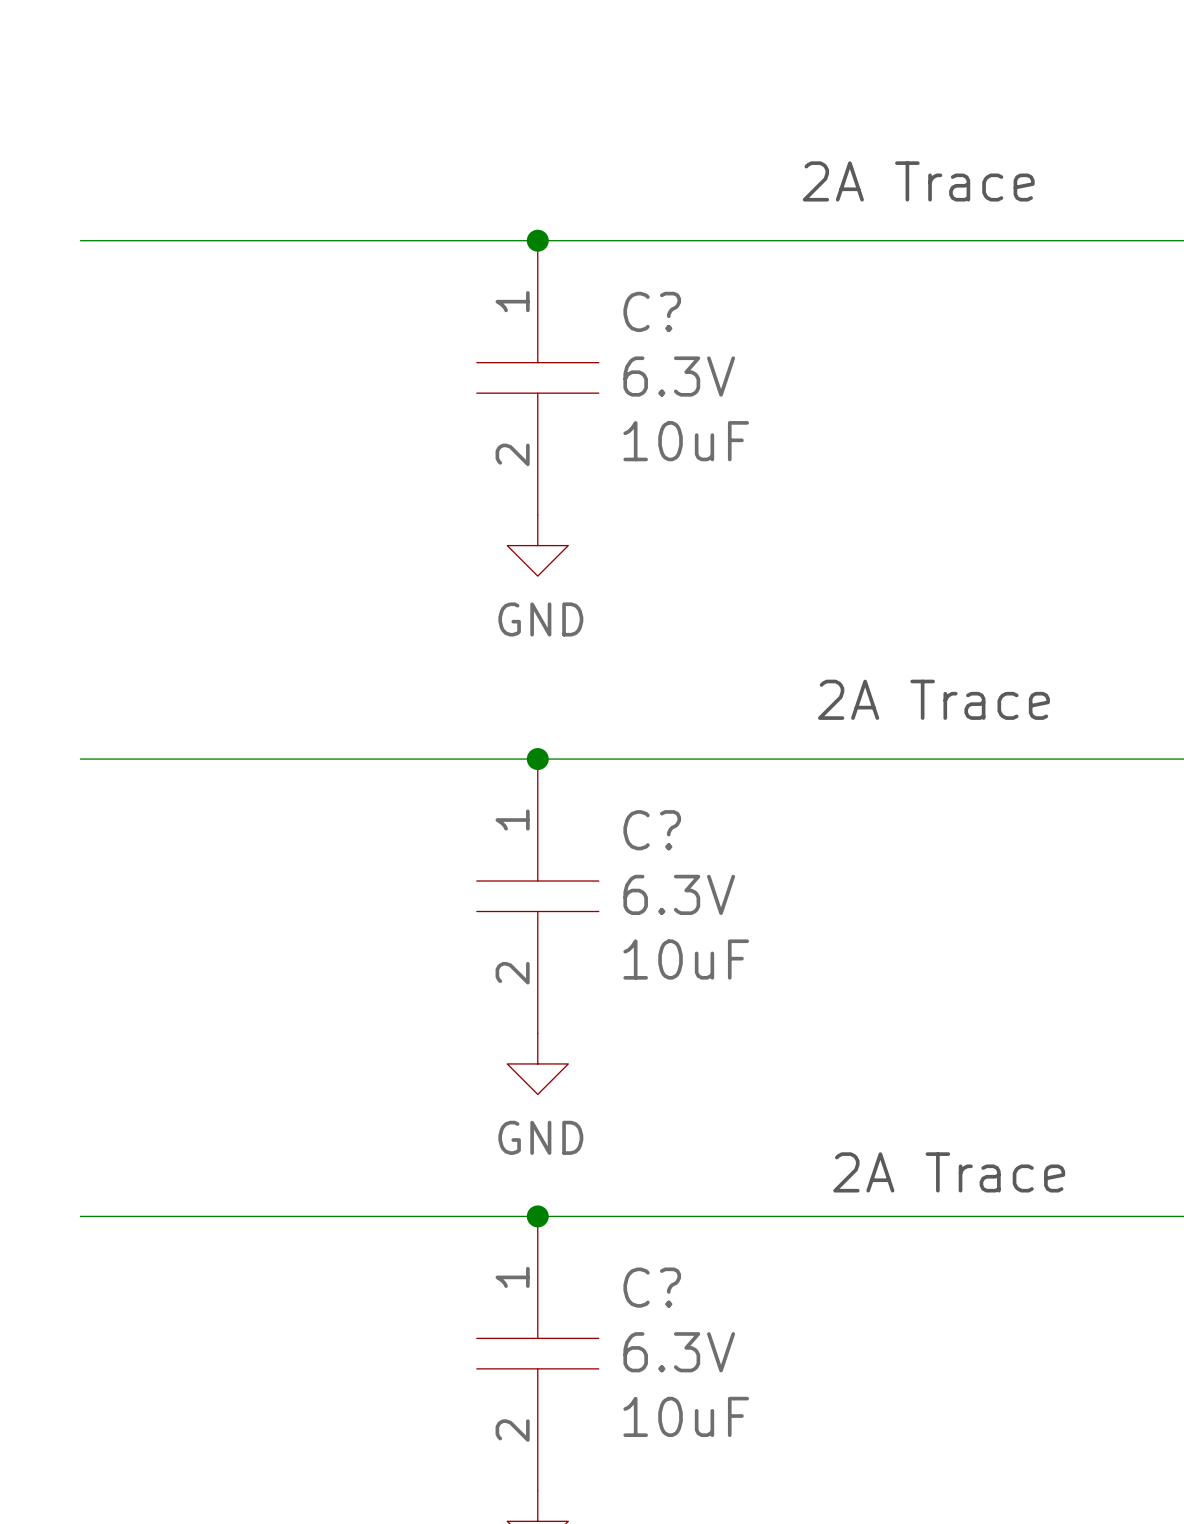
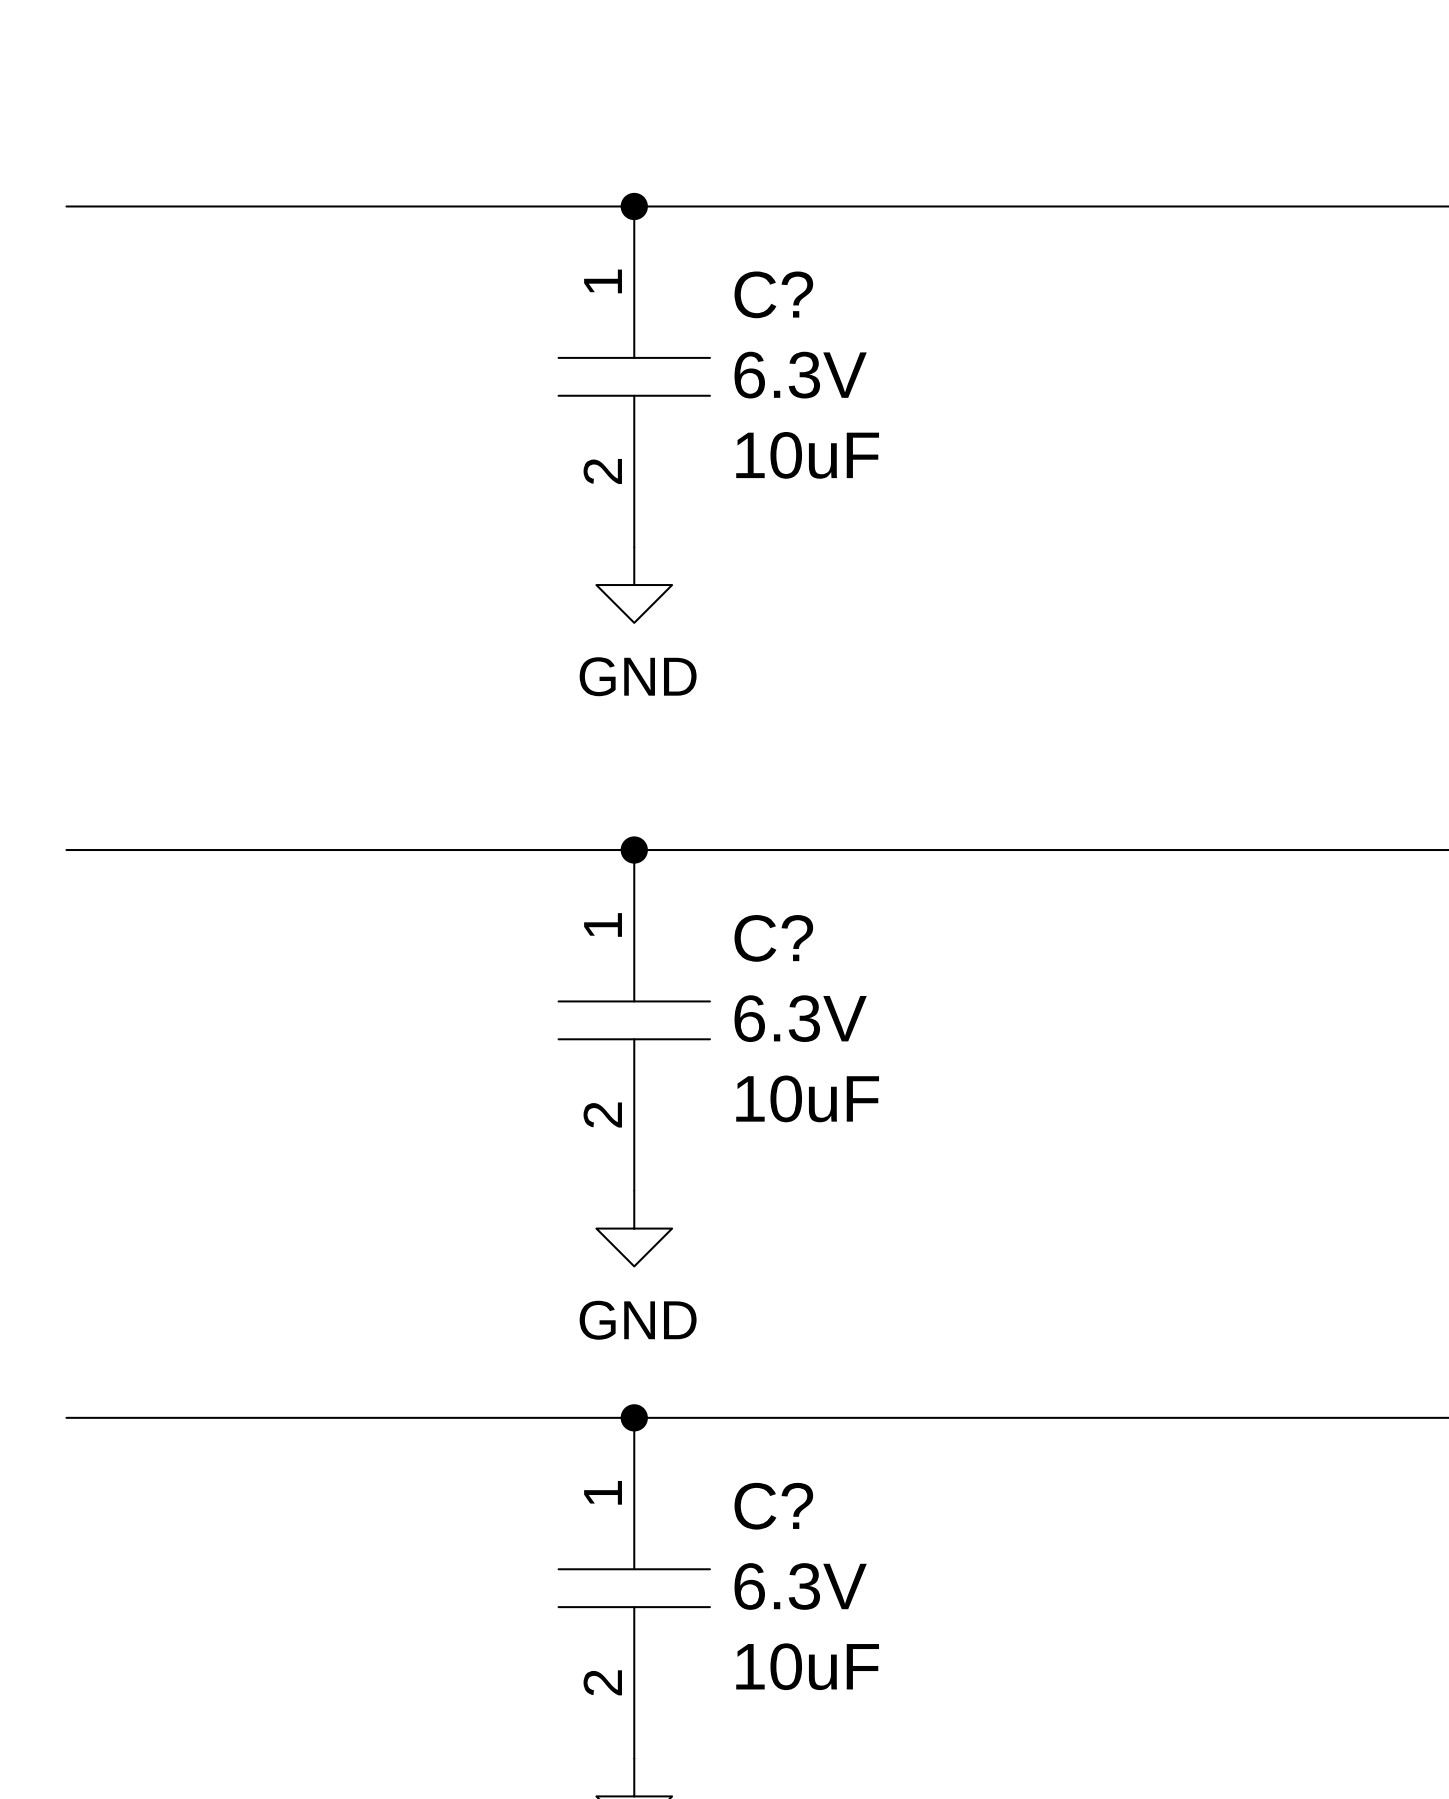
text: 2A Trace (918, 181) -> none
text: 2A Trace (933, 699) -> none
text: 2A Trace (949, 1172) -> none

